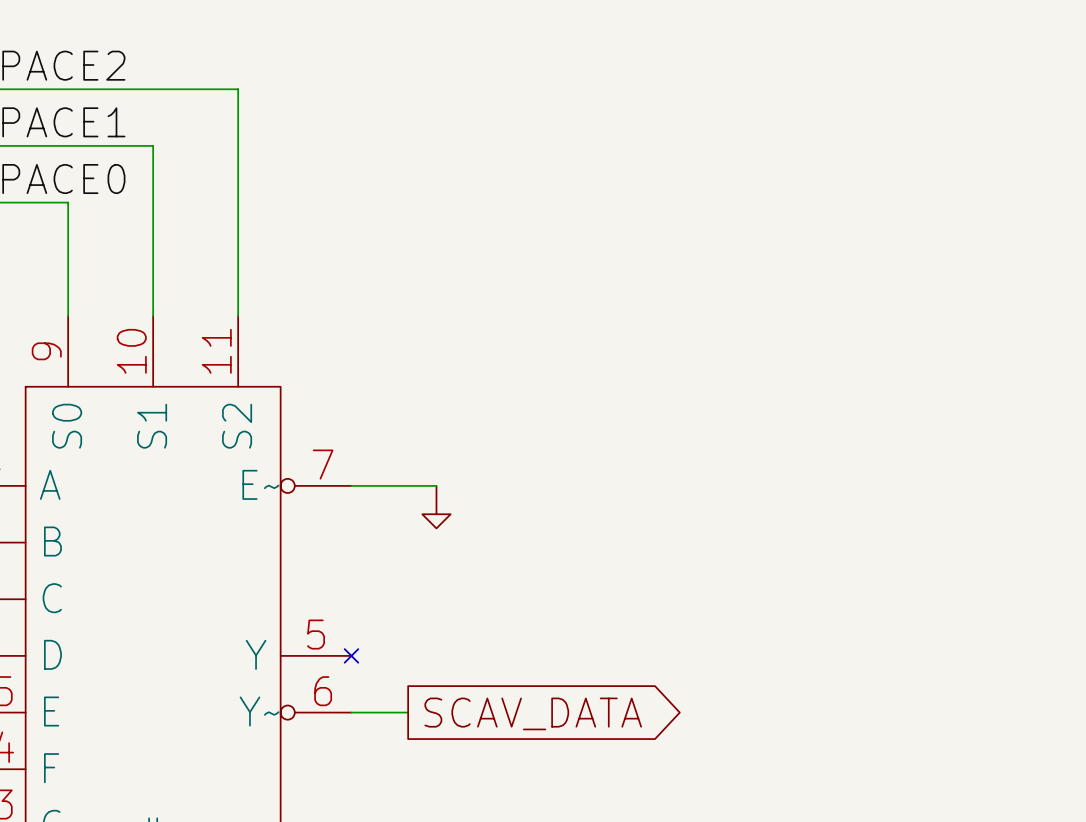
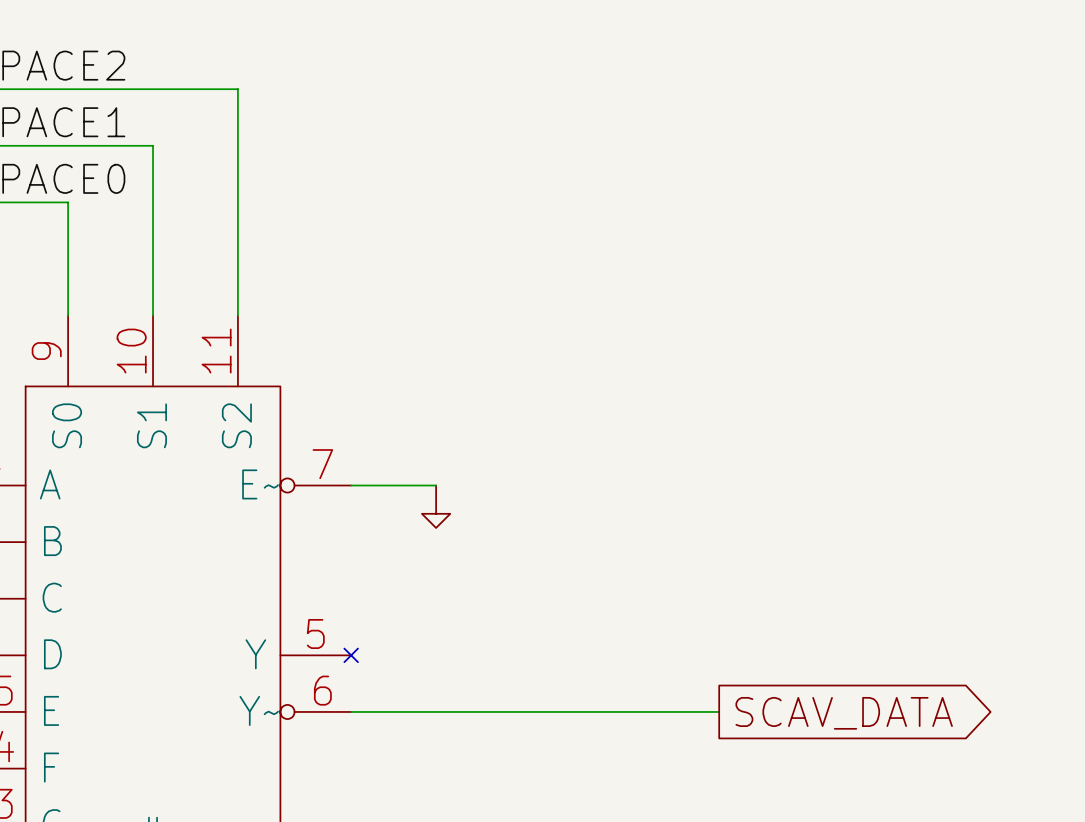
wire: none -> (407, 711) (719, 711)
global label: SCAV_DATA (533, 713) -> none
global label: none -> SCAV_DATA (844, 713)

